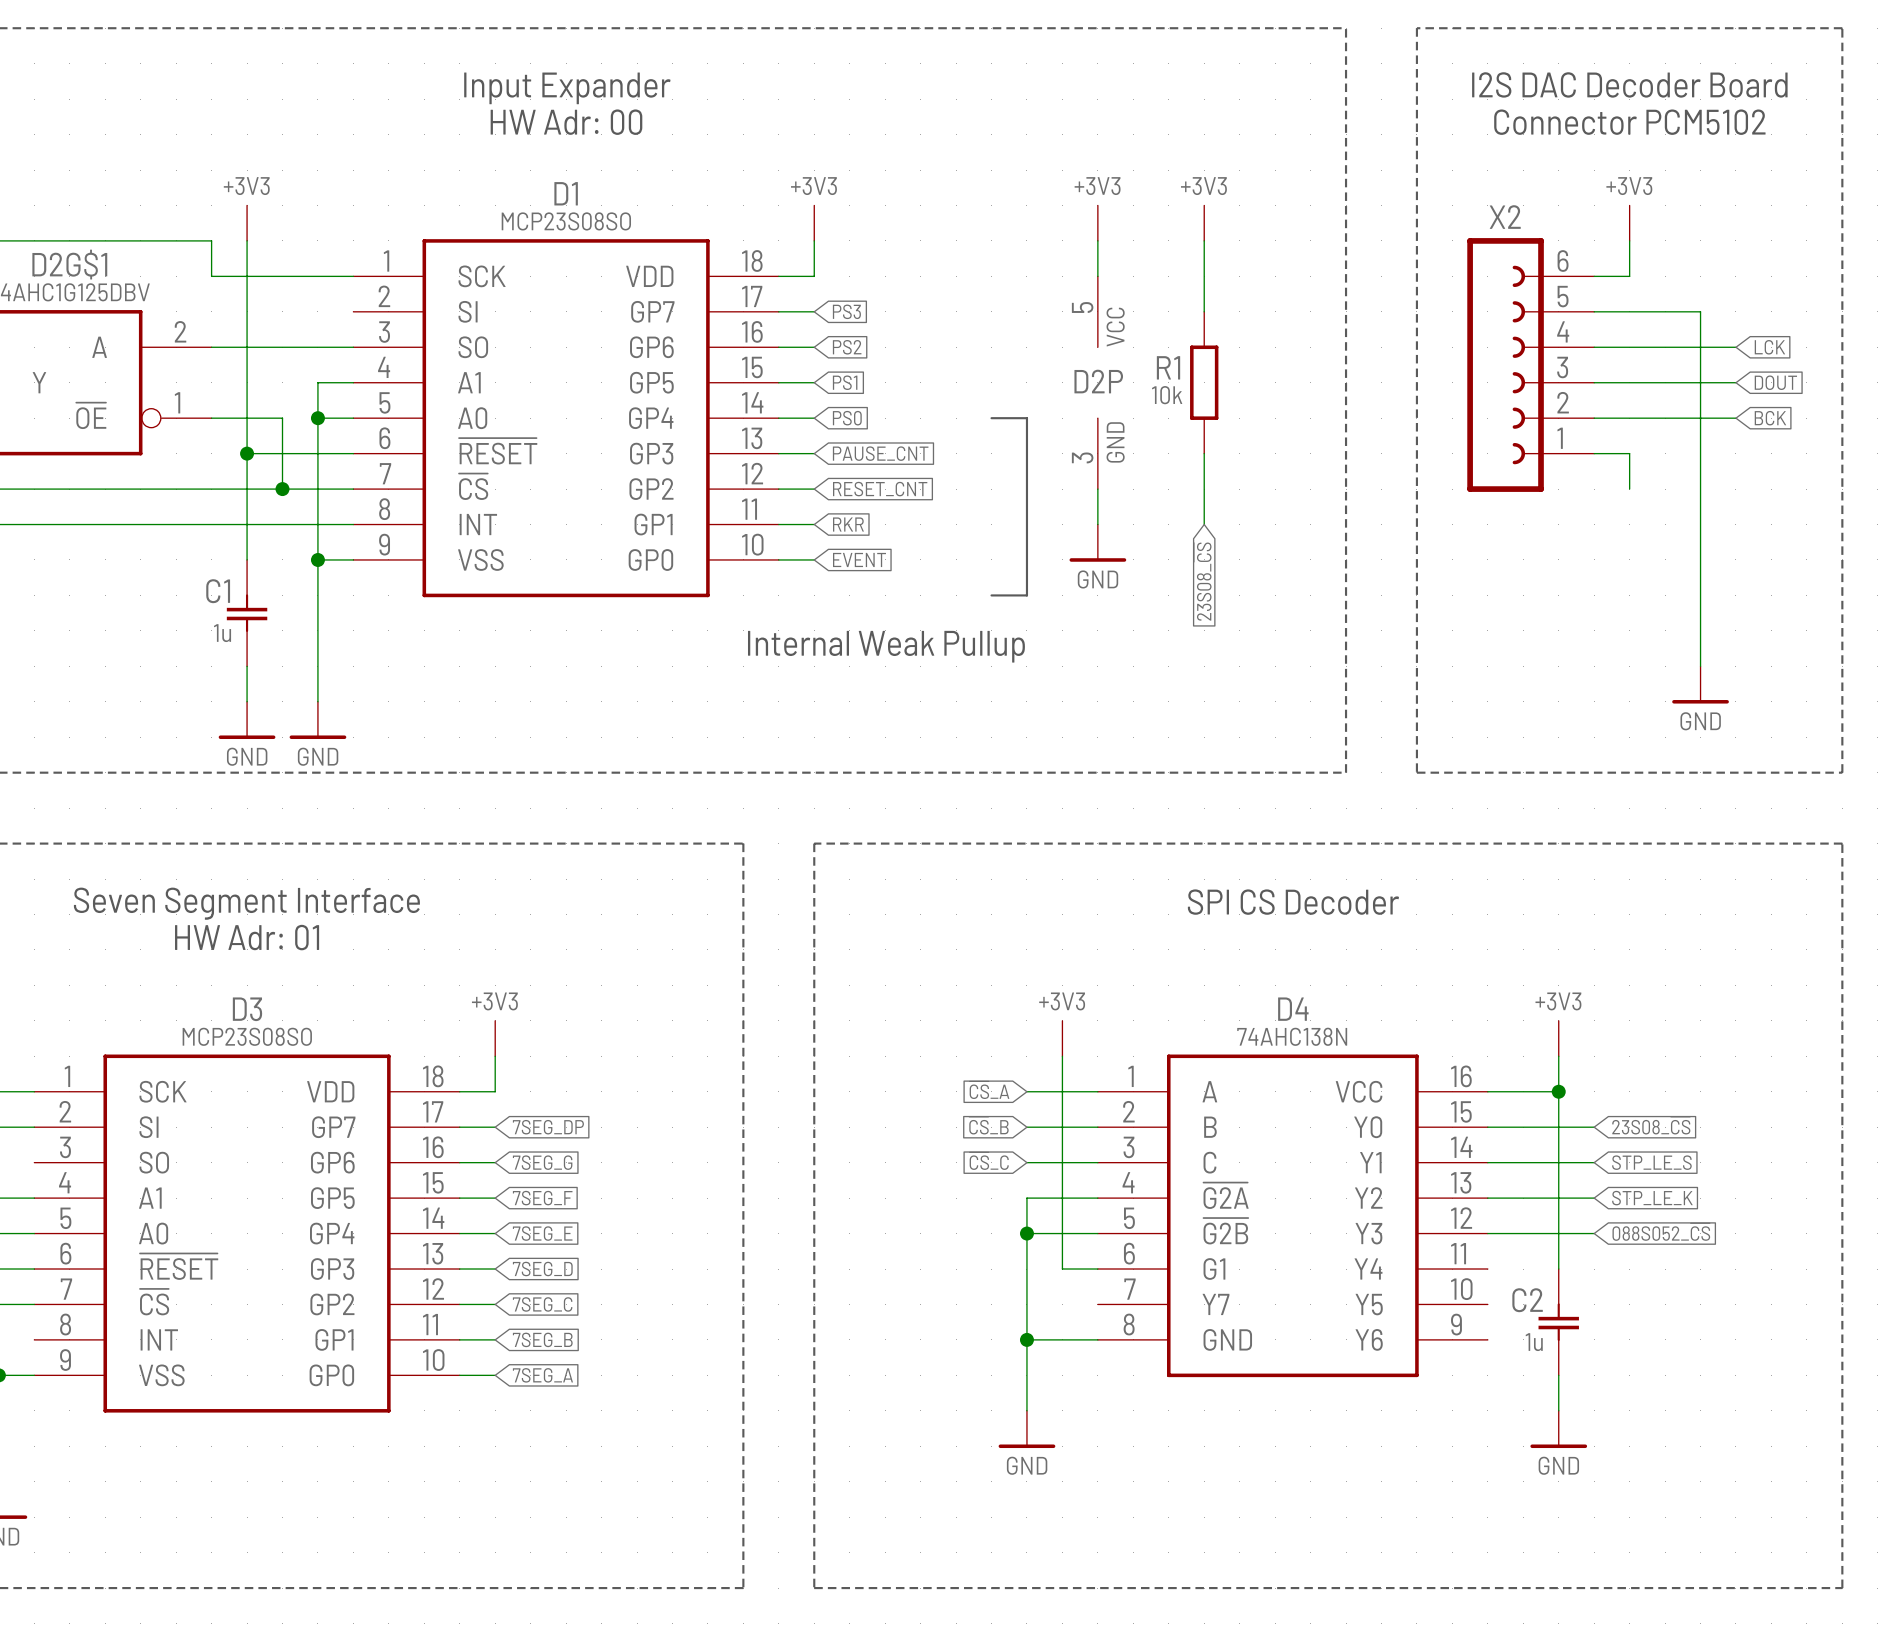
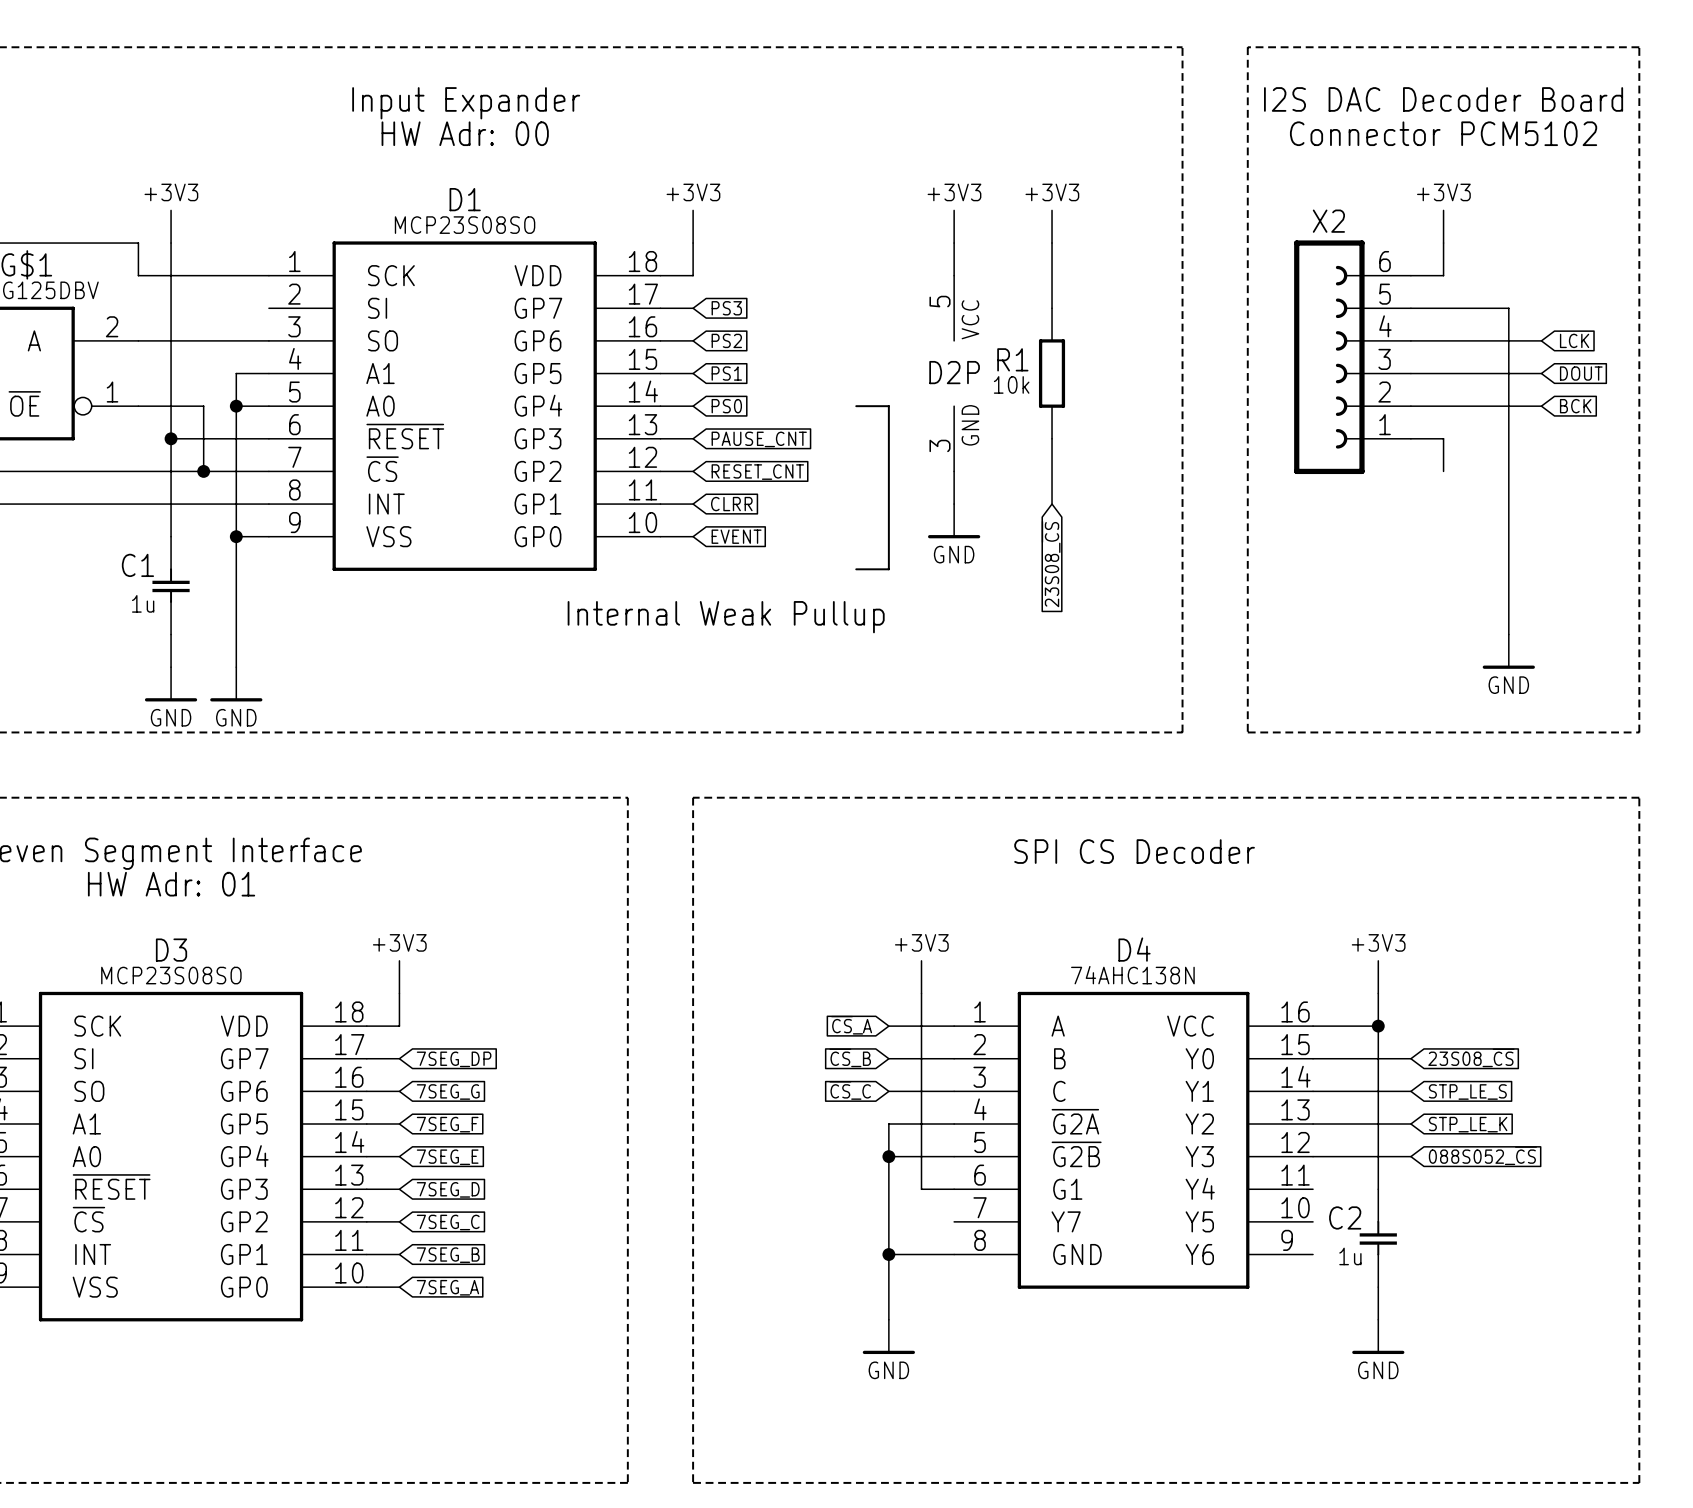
global label: RKR (848, 524) -> CLRR (731, 504)

